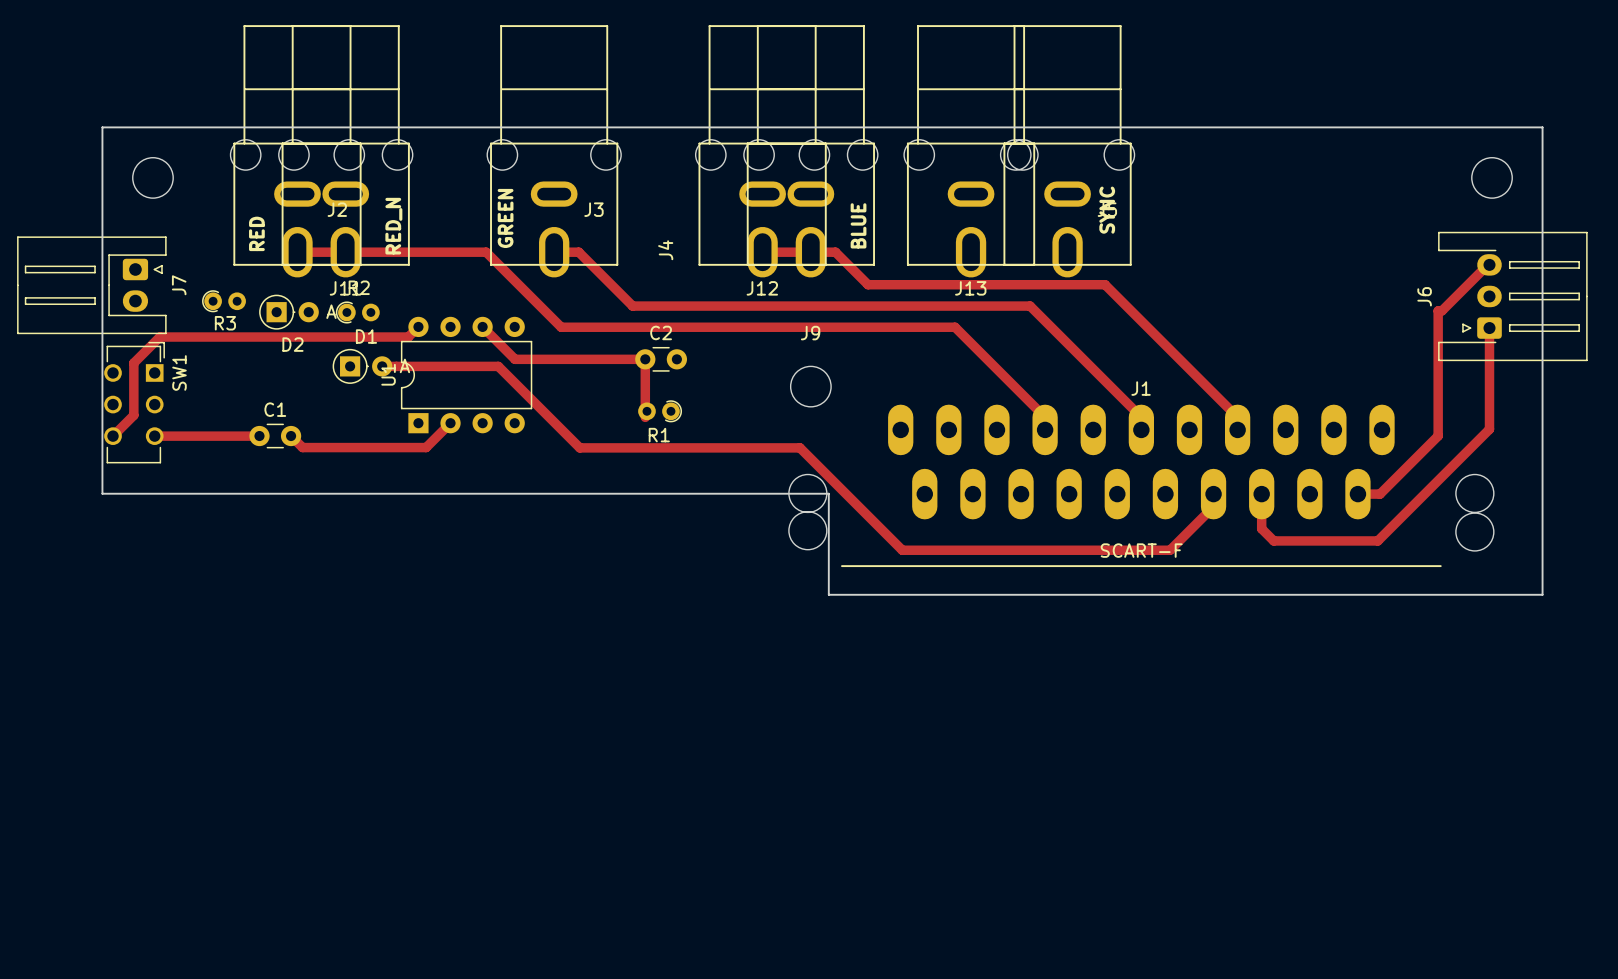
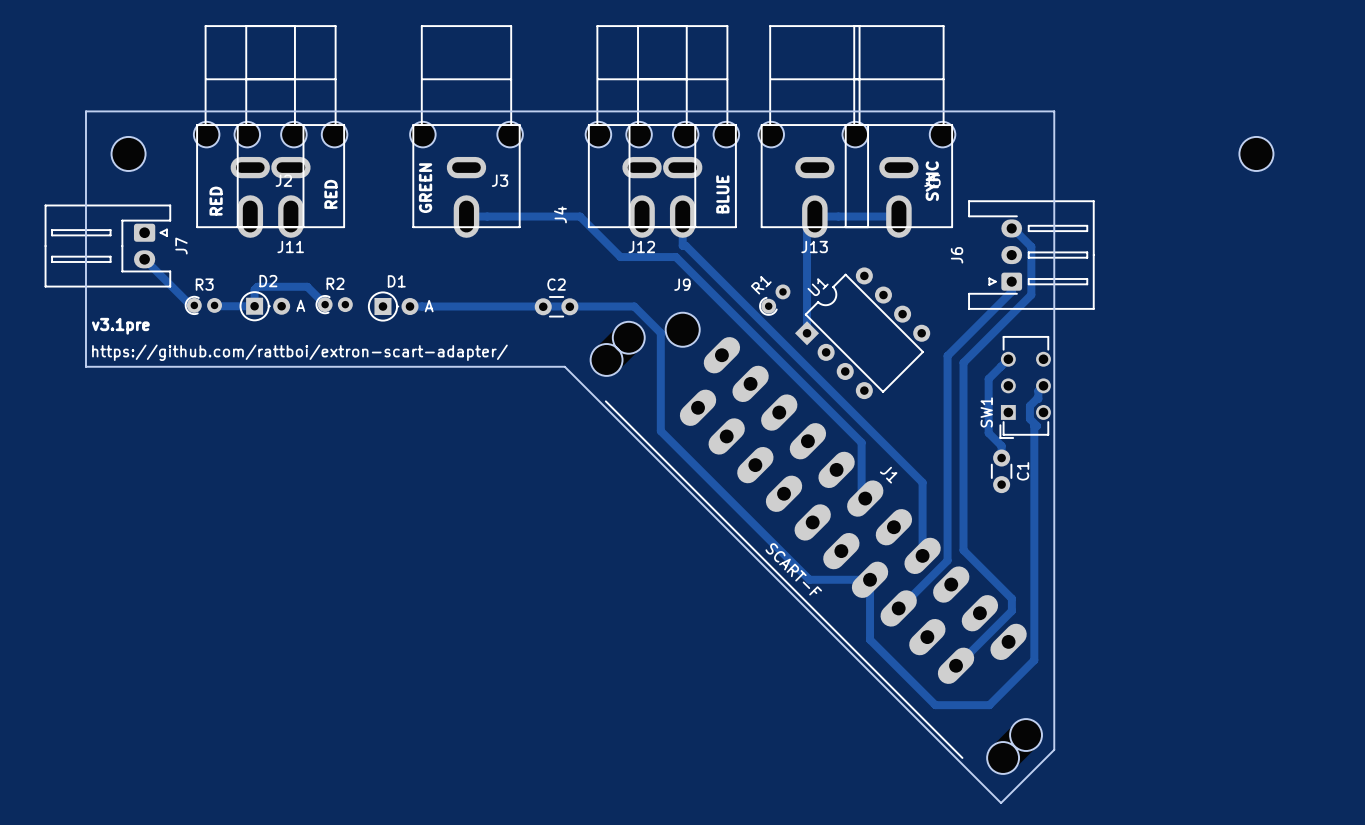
J13 footprint: [904, 25, 1039, 278] -> [758, 25, 869, 238]
board edge: (1252, 127) (1542, 127) (1542, 594) (828, 594) (828, 493) (102, 493) (102, 430) -> (1054, 111) (1054, 749) (1001, 803) (564, 366) (85, 366)
J11 value: RED_N (393, 226) -> RED (330, 194)
track: (297, 252) (486, 252) (561, 327) (955, 327) (1045, 417) (1045, 429) -> none
track: (578, 252) (632, 306) (1030, 306) (1141, 417) (1141, 429) -> (487, 216) (580, 216) (620, 257) (675, 257) (861, 442) (861, 503)
track: (762, 252) (835, 252) (868, 284) (1105, 284) (1237, 417) (1237, 429) -> none
track: none -> (682, 216) (682, 245) (685, 245) (922, 482) (922, 555)
track: (1489, 264) (1441, 310) (1438, 310) (1438, 435) (1380, 494) (1357, 494) -> none
track: none -> (1011, 228) (1031, 246) (1031, 294) (963, 362) (963, 550) (1011, 598) (1011, 610) (956, 665)
track: none -> (898, 231) (898, 216) (814, 216) (807, 224) (807, 333)
J7 position: (91, 285) -> (107, 246)
J6 position: (1512, 296) -> (1031, 255)
R3 position: (224, 301) -> (203, 305)
track: none -> (144, 259) (190, 305) (194, 305)
D2 position: (288, 312) -> (265, 306)
R2 position: (357, 312) -> (334, 304)
R3 name position: R3 (225, 323) -> R3 (204, 284)
track: (418, 326) (408, 337) (159, 337) (133, 363) (133, 415) (113, 436) -> none
track: (482, 326) (515, 359) (645, 359) (645, 417) -> none
track: (1489, 328) (1489, 429) (1377, 540) (1273, 540) (1261, 528) (1261, 494) -> none
track: none -> (1011, 281) (1011, 291) (947, 355) (947, 560) (895, 613)
D2 name position: D2 (292, 344) -> D2 (268, 281)
track: none -> (325, 304) (307, 286) (257, 286) (254, 289) (254, 306) (214, 305)
track: none -> (410, 306) (634, 306) (660, 332) (660, 431) (809, 579) (870, 579) (870, 639) (935, 705) (989, 705) (1034, 660) (1034, 426) (1036, 426) (1029, 418) (1029, 405) (1038, 398) (1038, 390) (1043, 385)
D1 position: (362, 366) -> (393, 306)
track: (382, 366) (498, 366) (579, 447) (799, 447) (902, 550) (1170, 550) (1213, 506) (1213, 494) -> none
U1 rotation: 0° (466, 375) -> 45° clockwise (862, 333)
U1 position: (466, 375) -> (862, 333)
text: none -> v3.1pre (120, 326)
J1 name position: J1 (1141, 388) -> J1 (888, 475)
SW1 rotation: 0° (134, 402) -> 180° (1025, 387)
SW1 position: (134, 402) -> (1025, 387)
R1 rotation: 0° (660, 411) -> 135° clockwise (774, 299)
R1 position: (660, 411) -> (774, 299)
text: none -> https://github.com/rattboi/extron-scart-adapter/ (299, 352)
track: none -> (1008, 359) (988, 378) (988, 433) (1001, 445) (1001, 458)
track: (450, 423) (426, 447) (302, 447) (291, 436) -> none
track: (154, 436) (259, 436) -> none
C1 rotation: 0° (275, 436) -> 90° clockwise (1001, 471)
C1 position: (275, 436) -> (1001, 471)
J1 rotation: 0° (1141, 485) -> 45° clockwise (816, 547)
J1 value position: SCART-F (1141, 550) -> SCART-F (793, 569)

